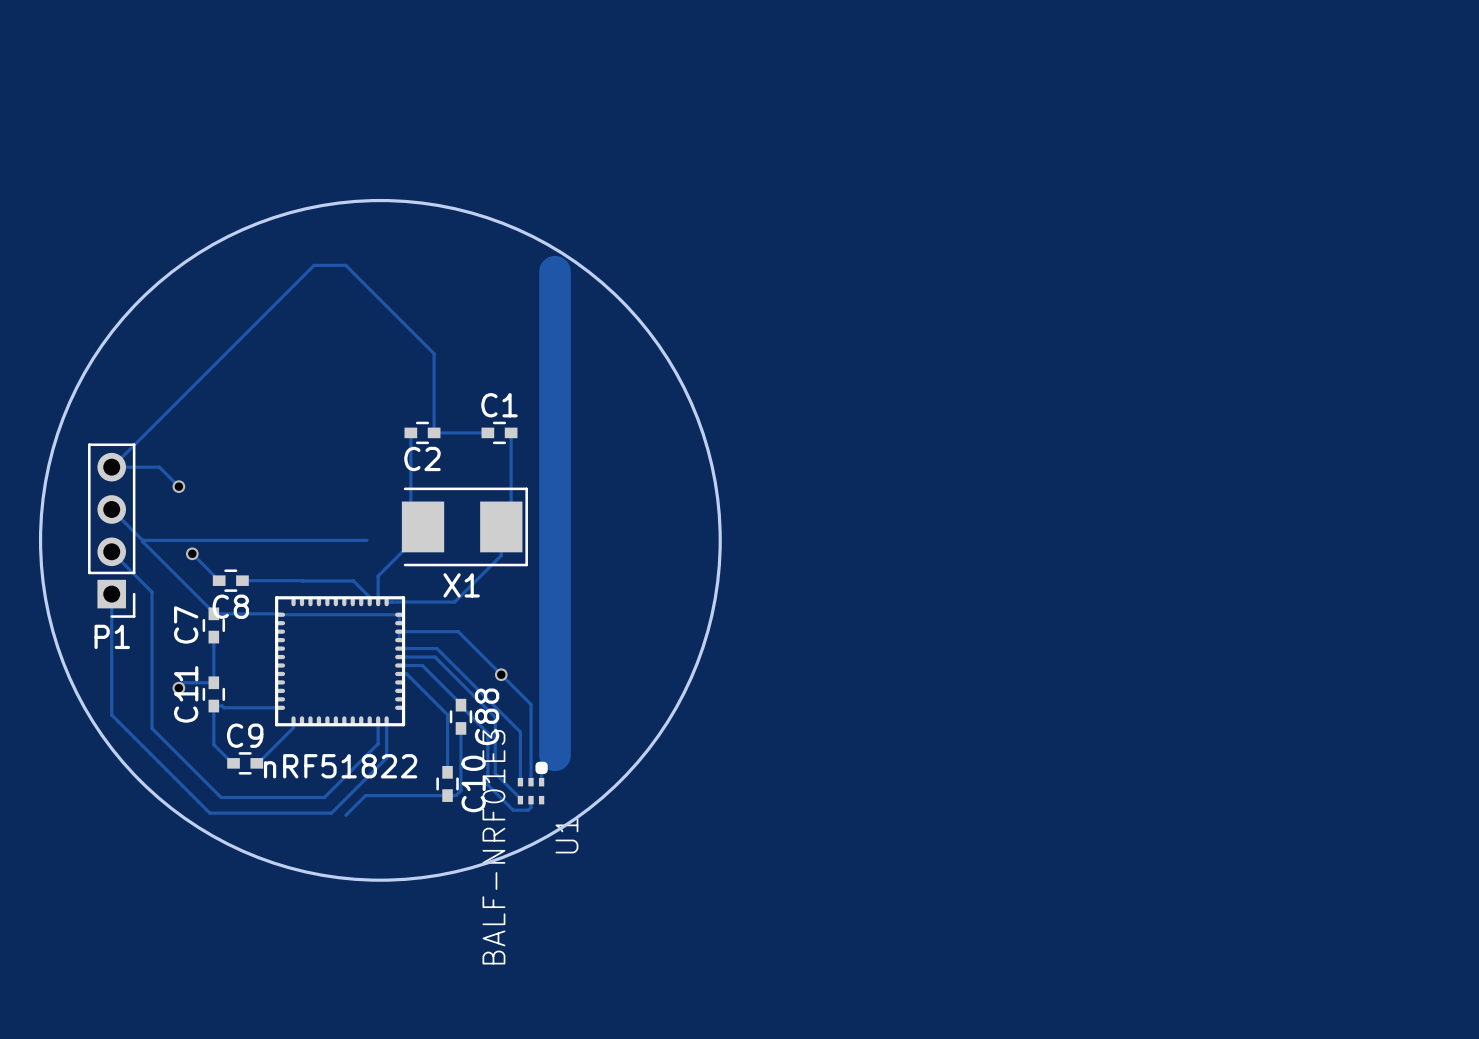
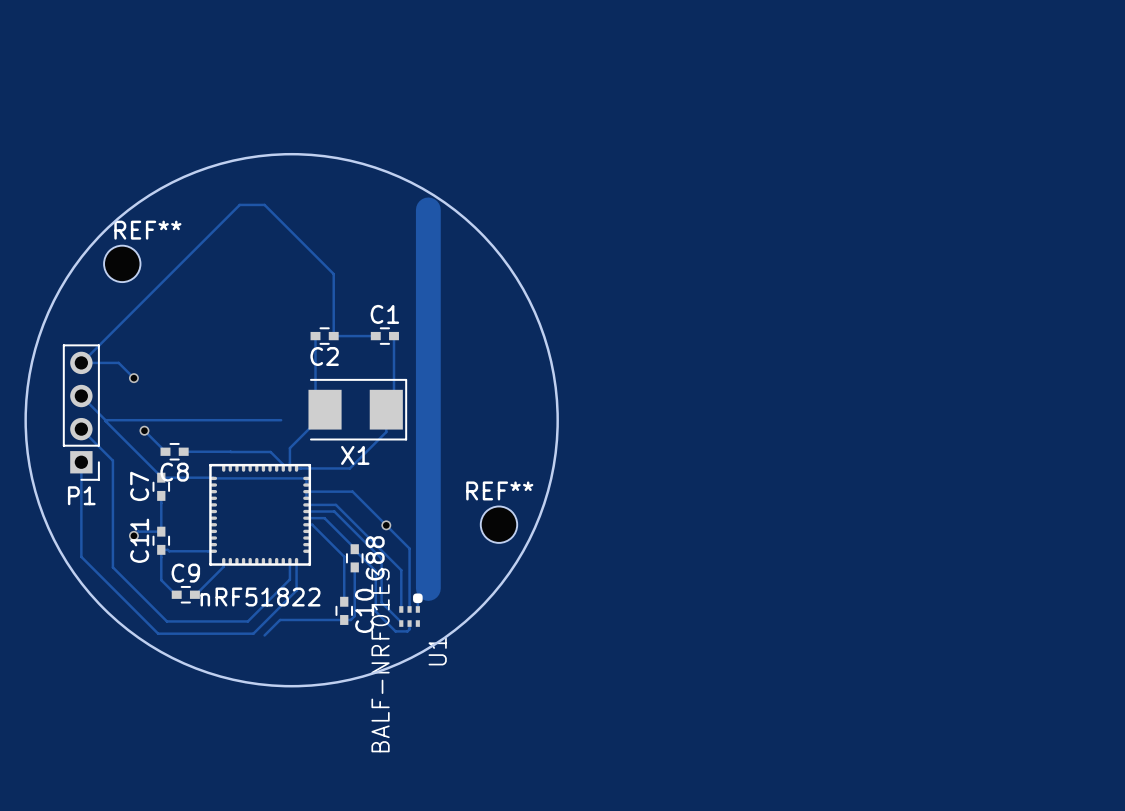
REF**: none -> (122, 263)
REF**: none -> (498, 524)

